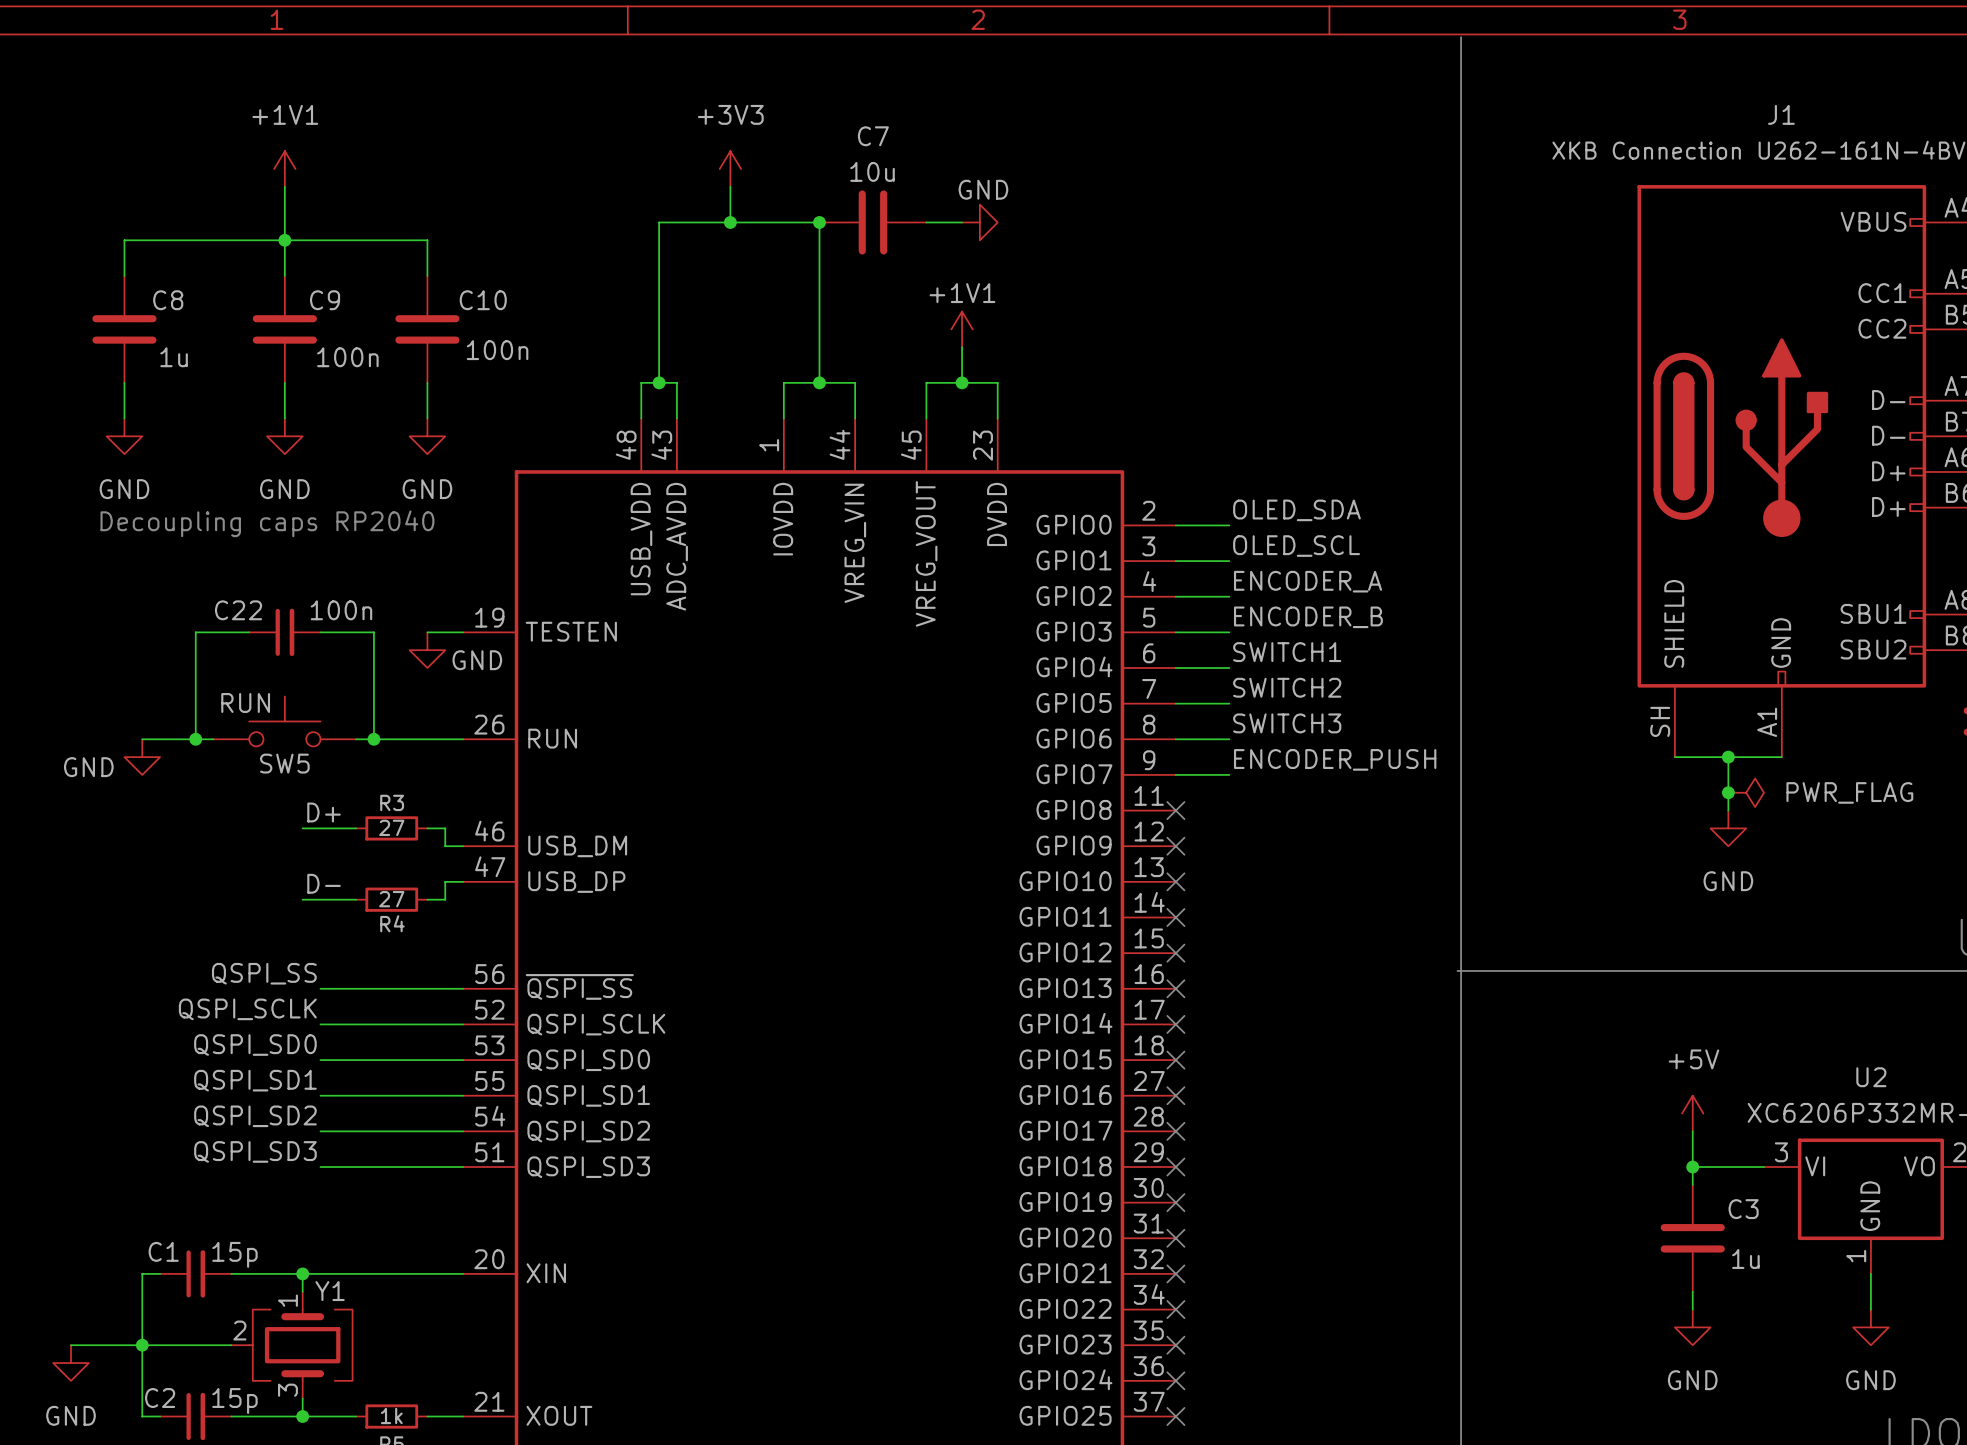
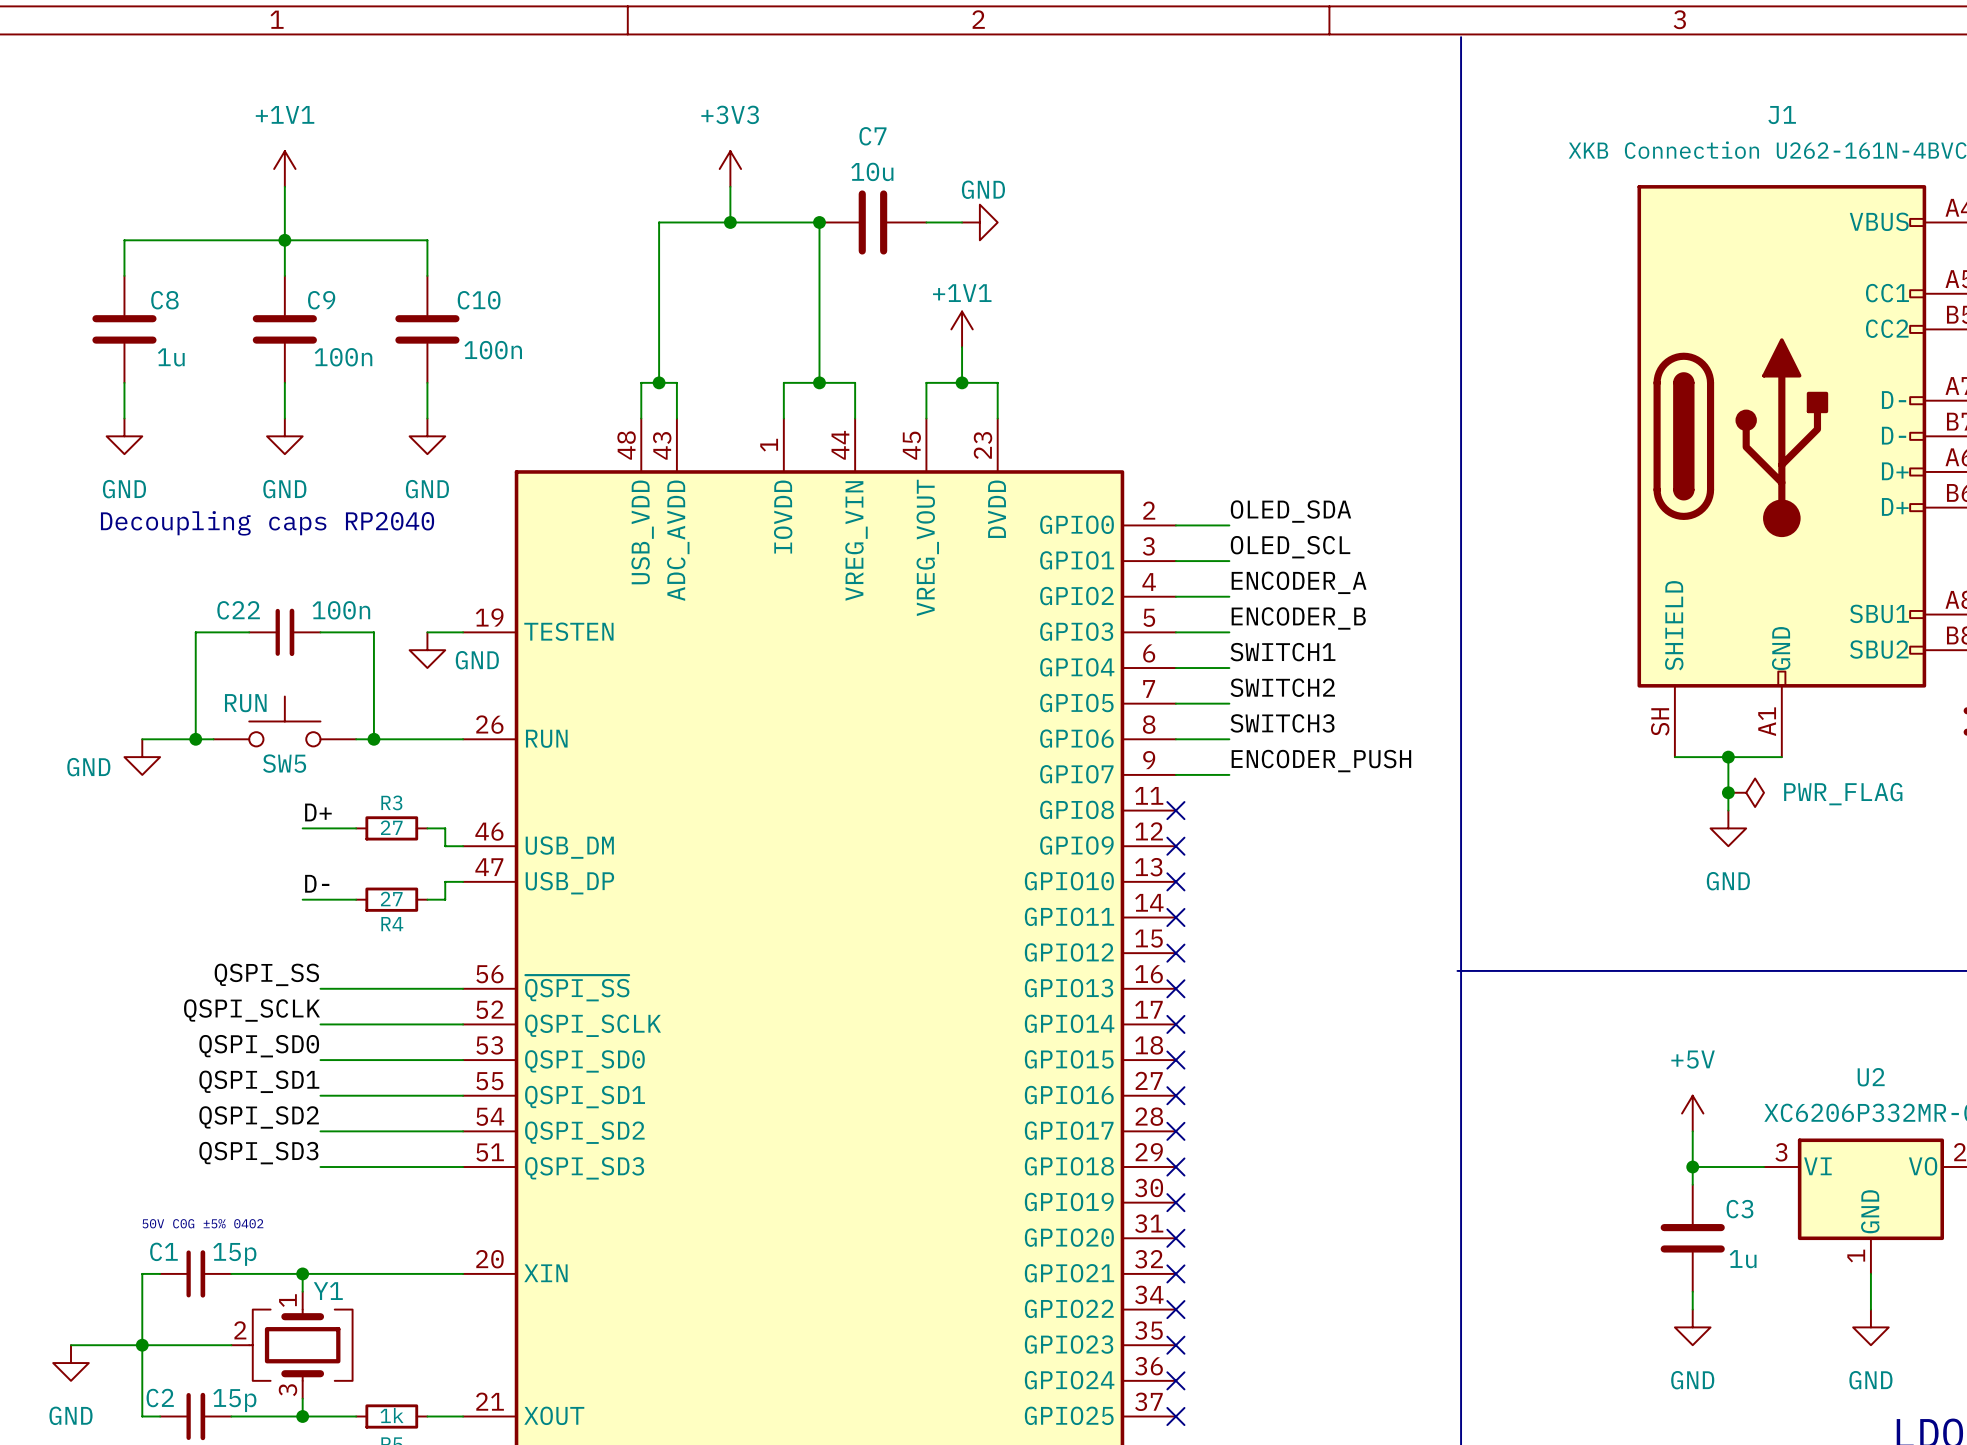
text: none -> 50V C0G ±5% 0402 (202, 1223)

